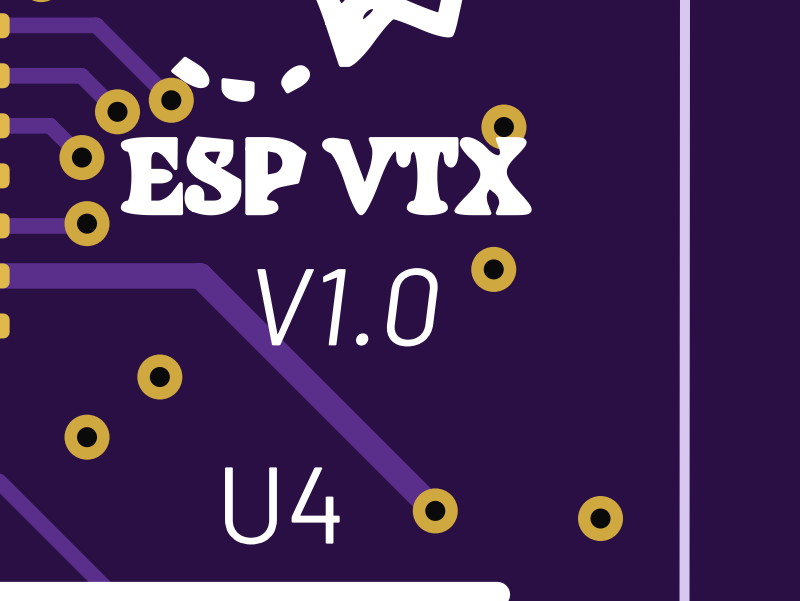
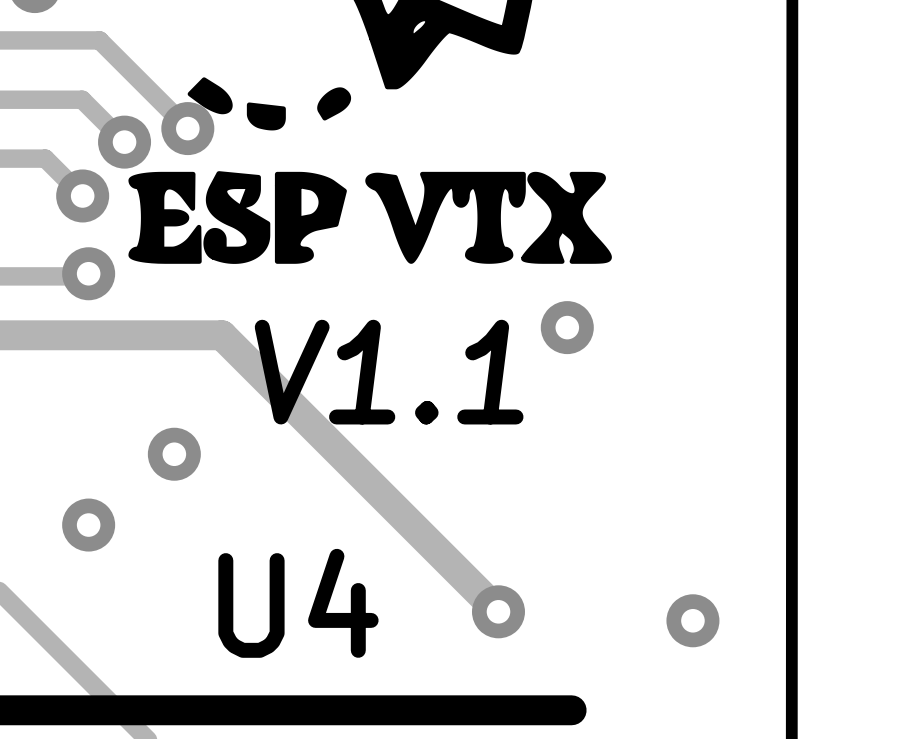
via: (503, 127) -> none
text: V1.0 (348, 307) -> V1.1 (389, 372)

